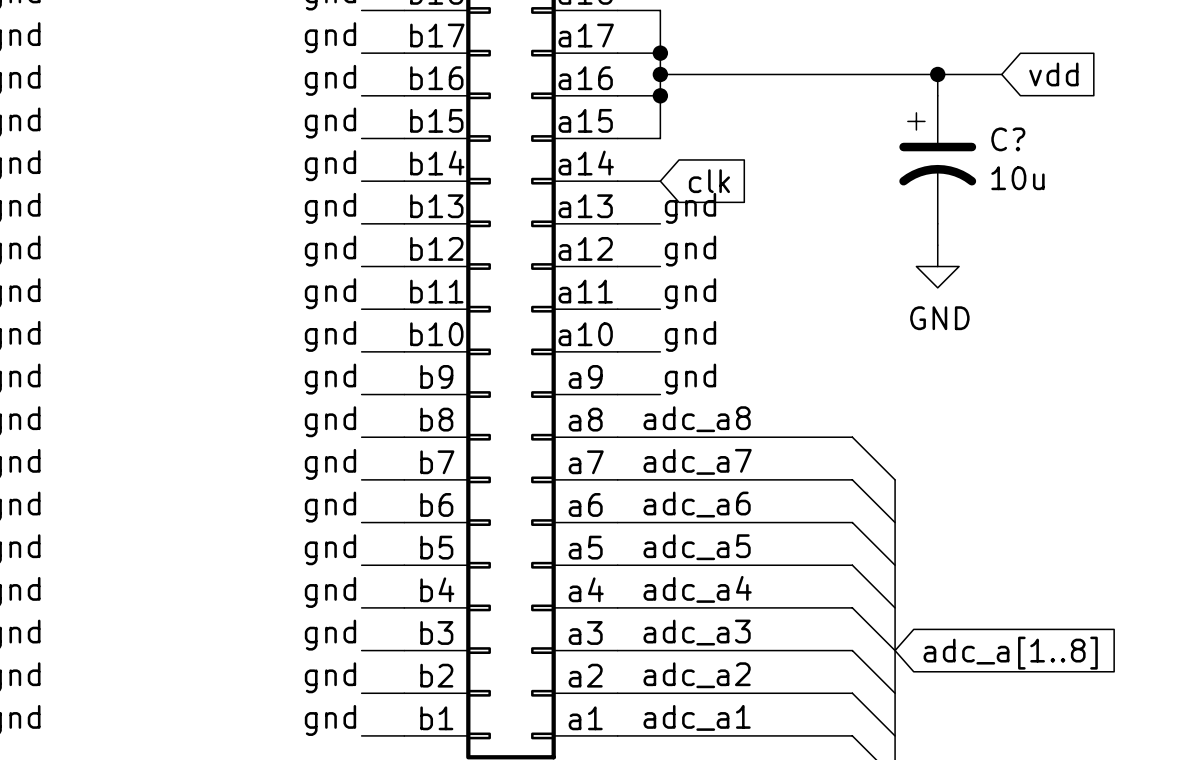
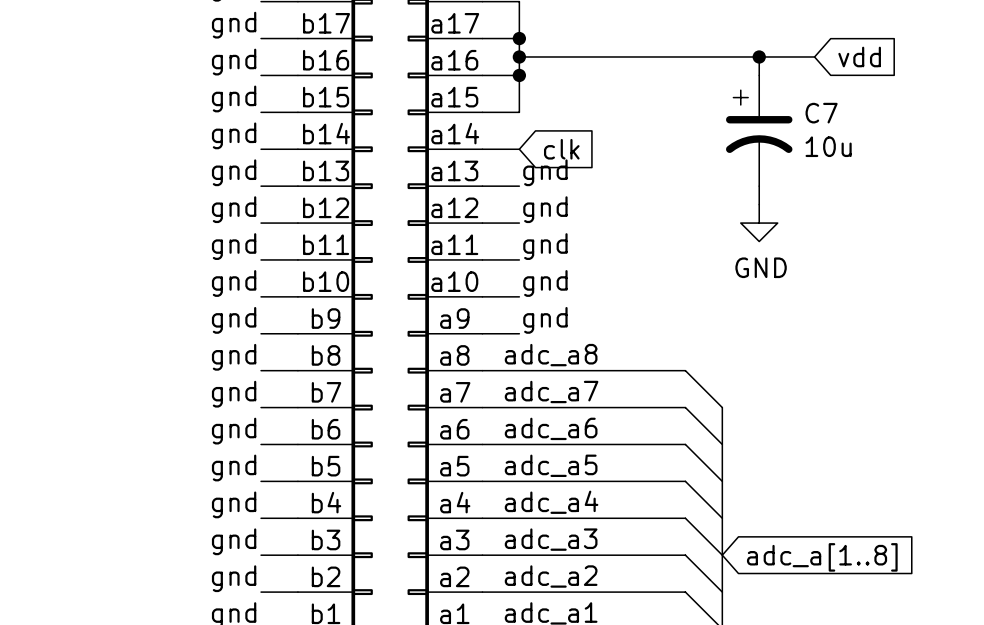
C? name: C? (1008, 139) -> C7 (821, 113)

